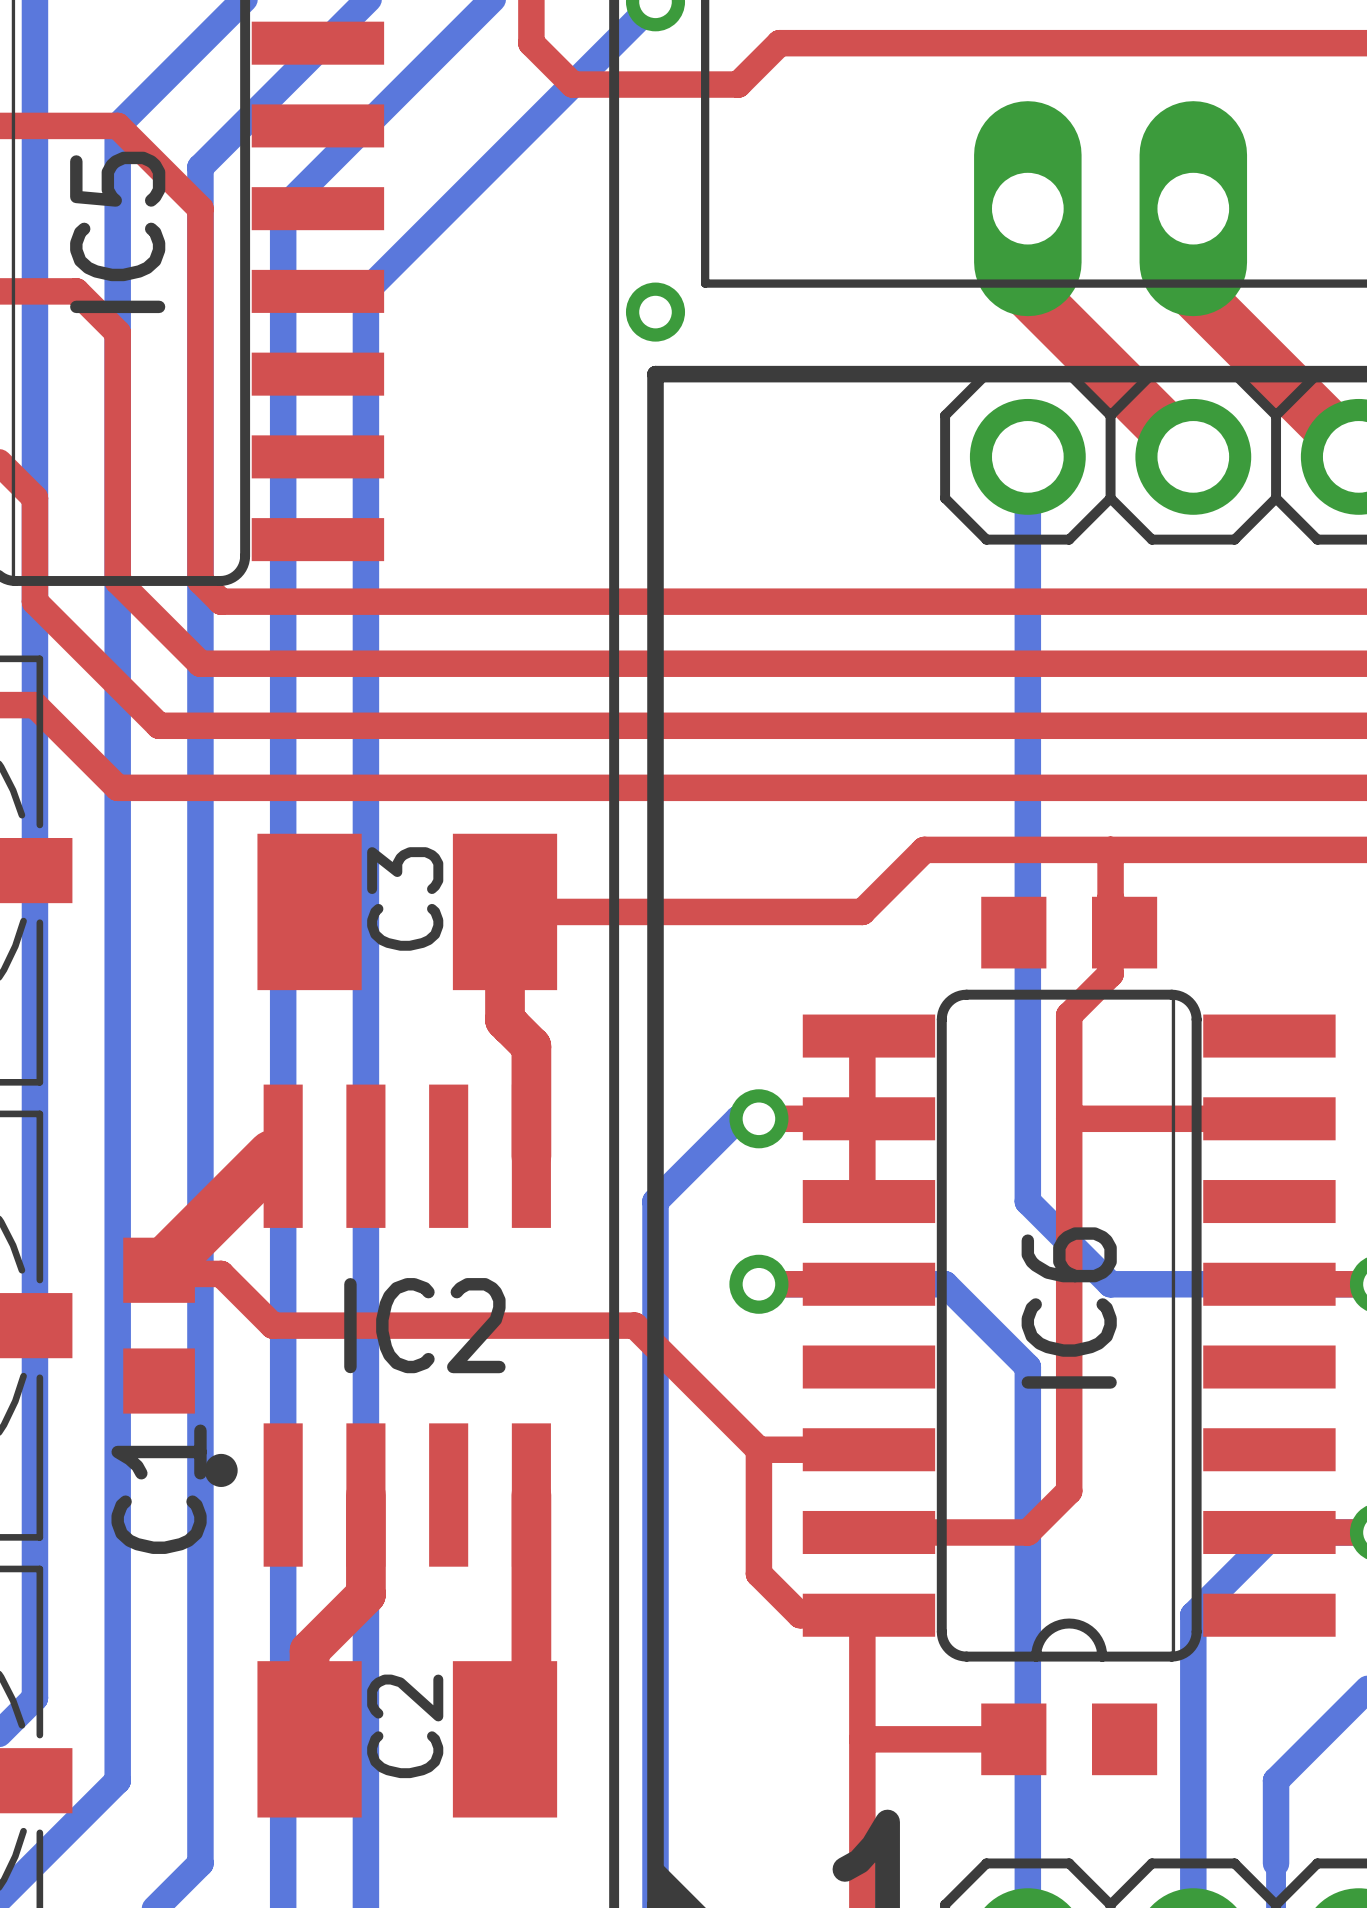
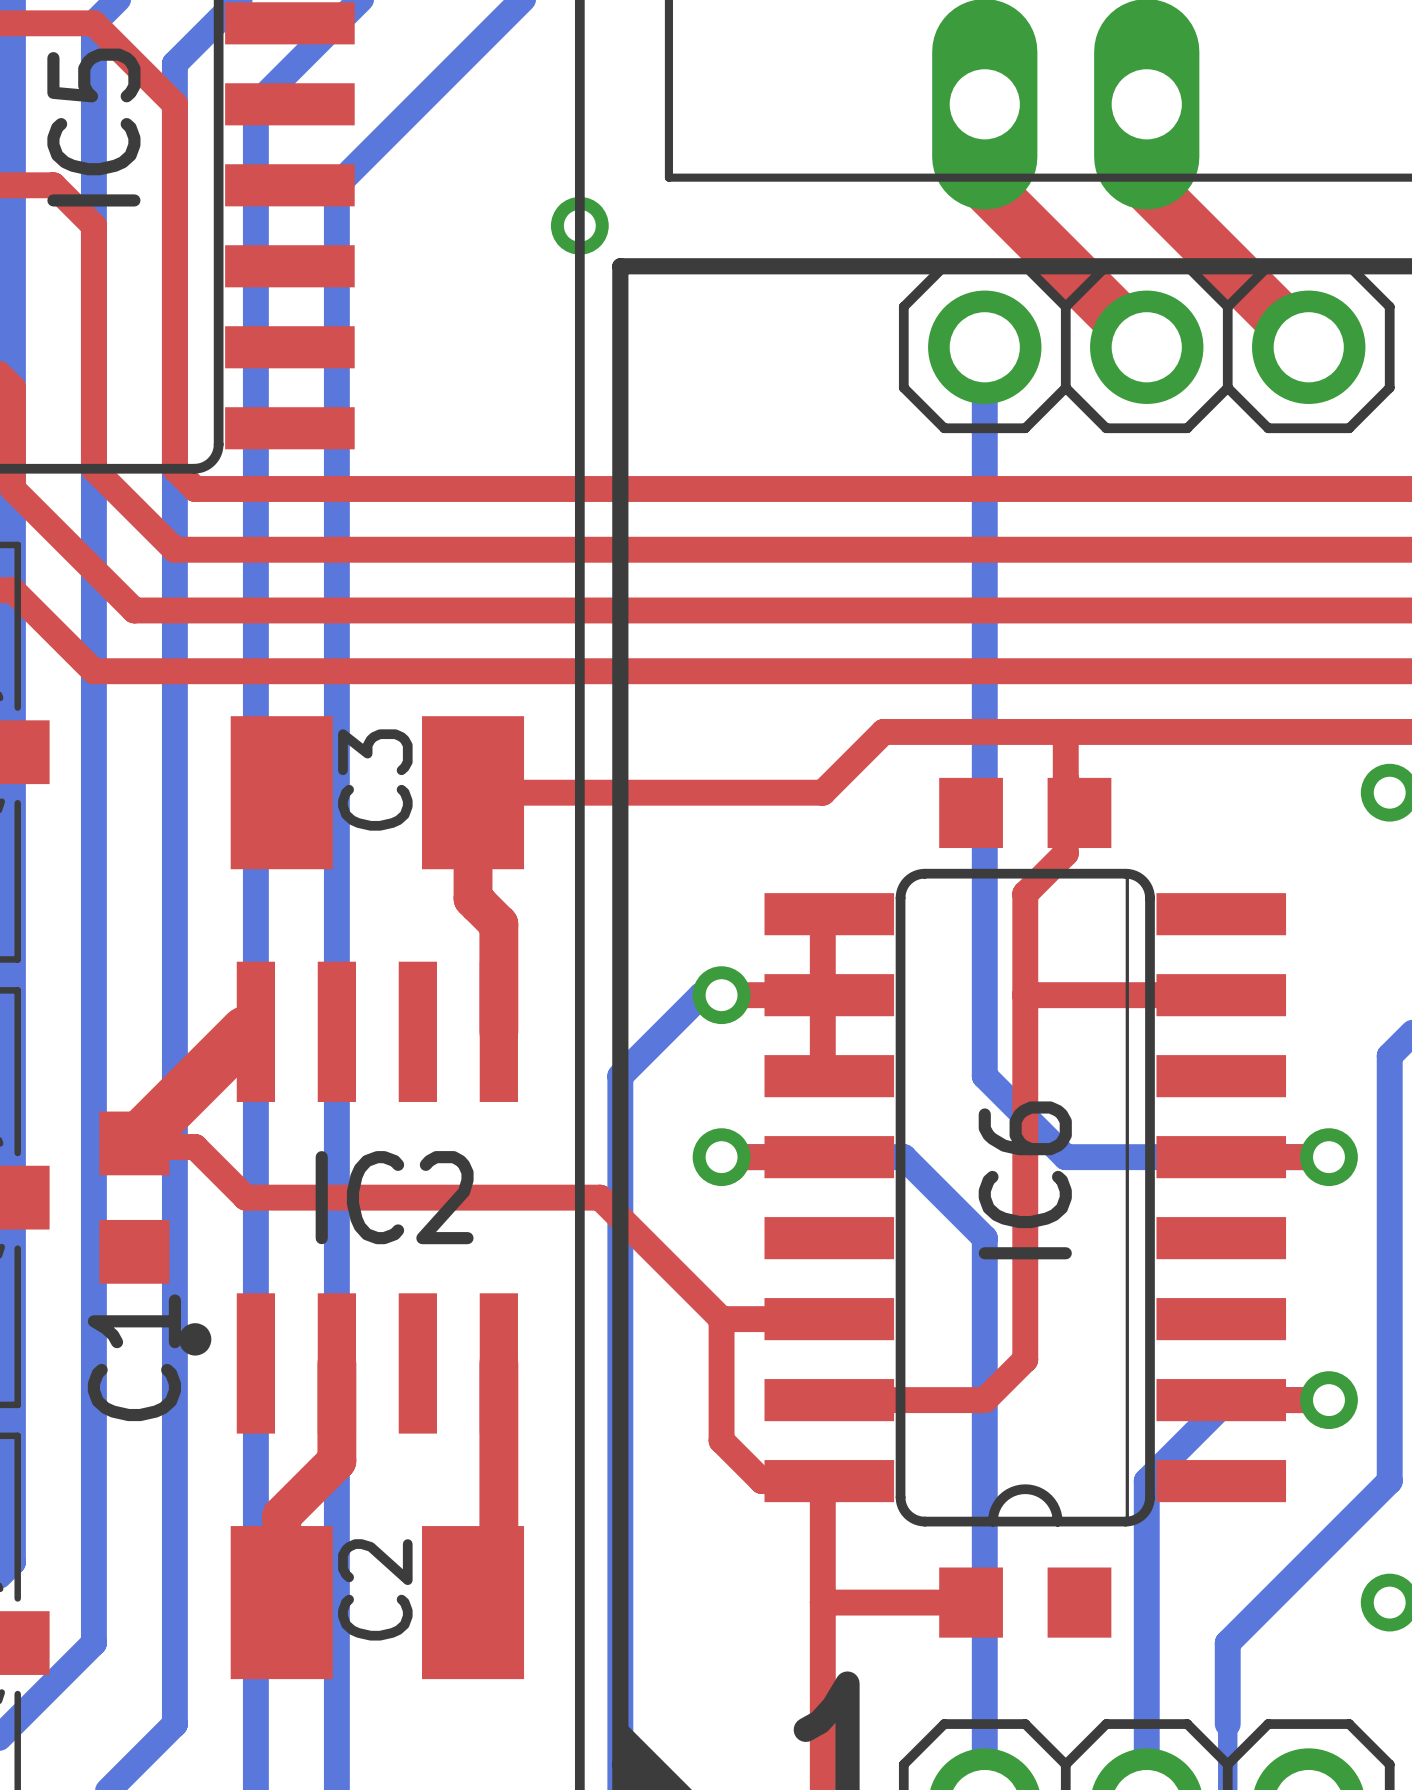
via position: (655, 312) -> (579, 225)

